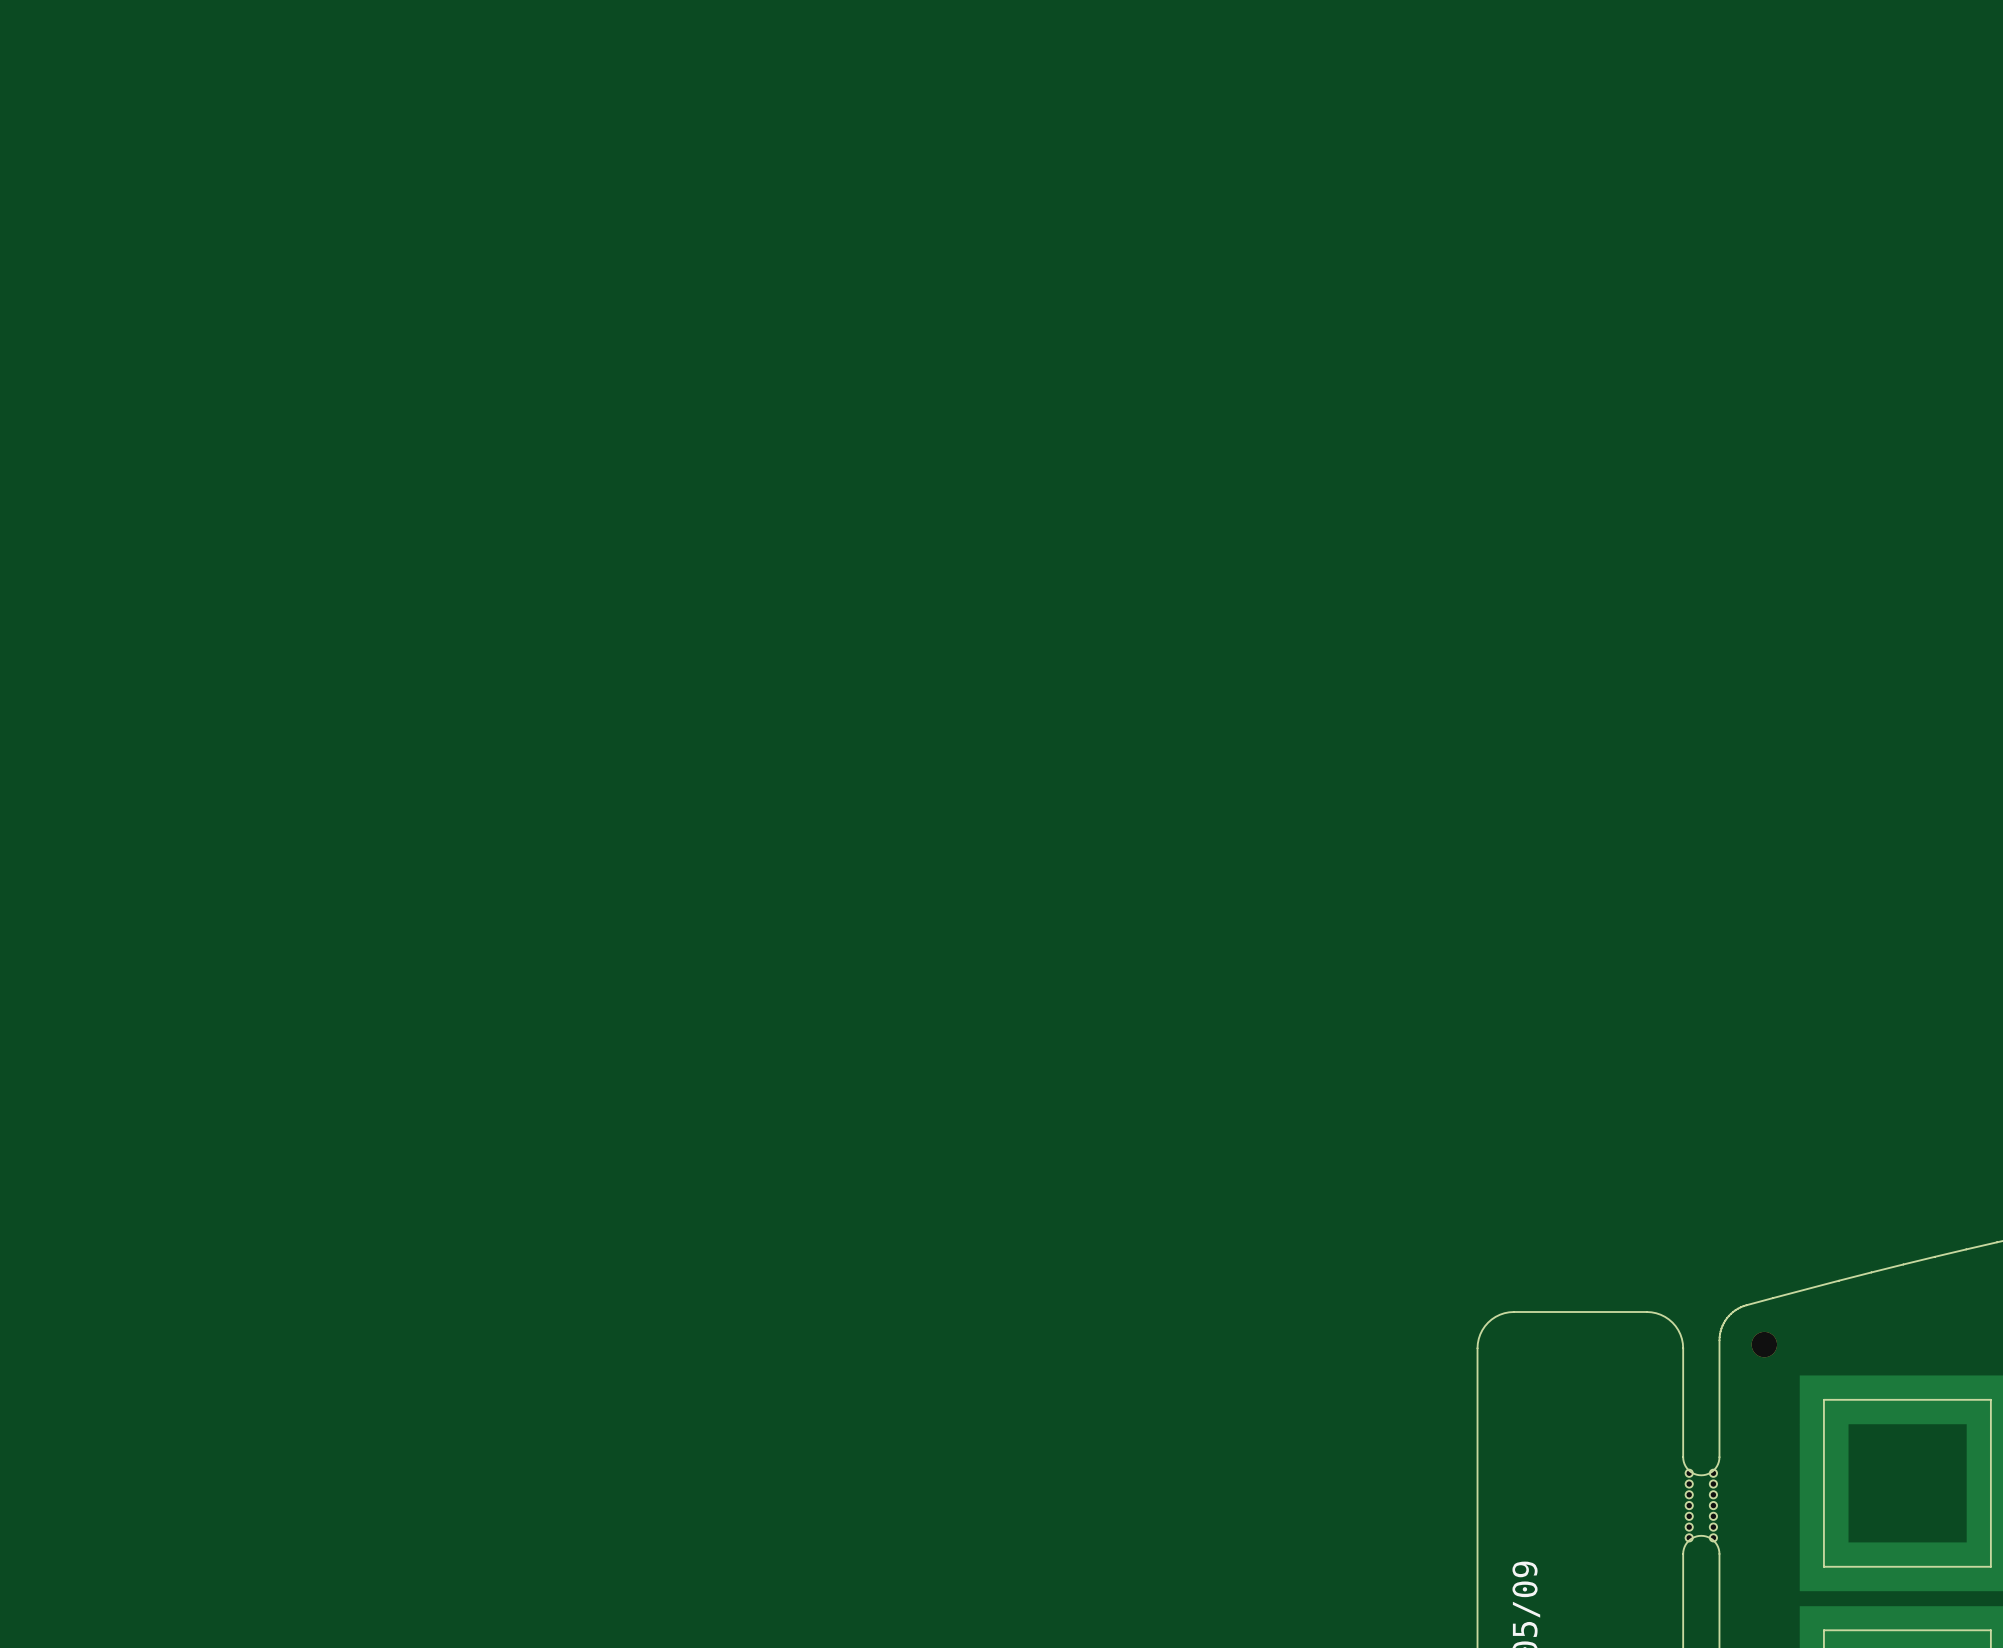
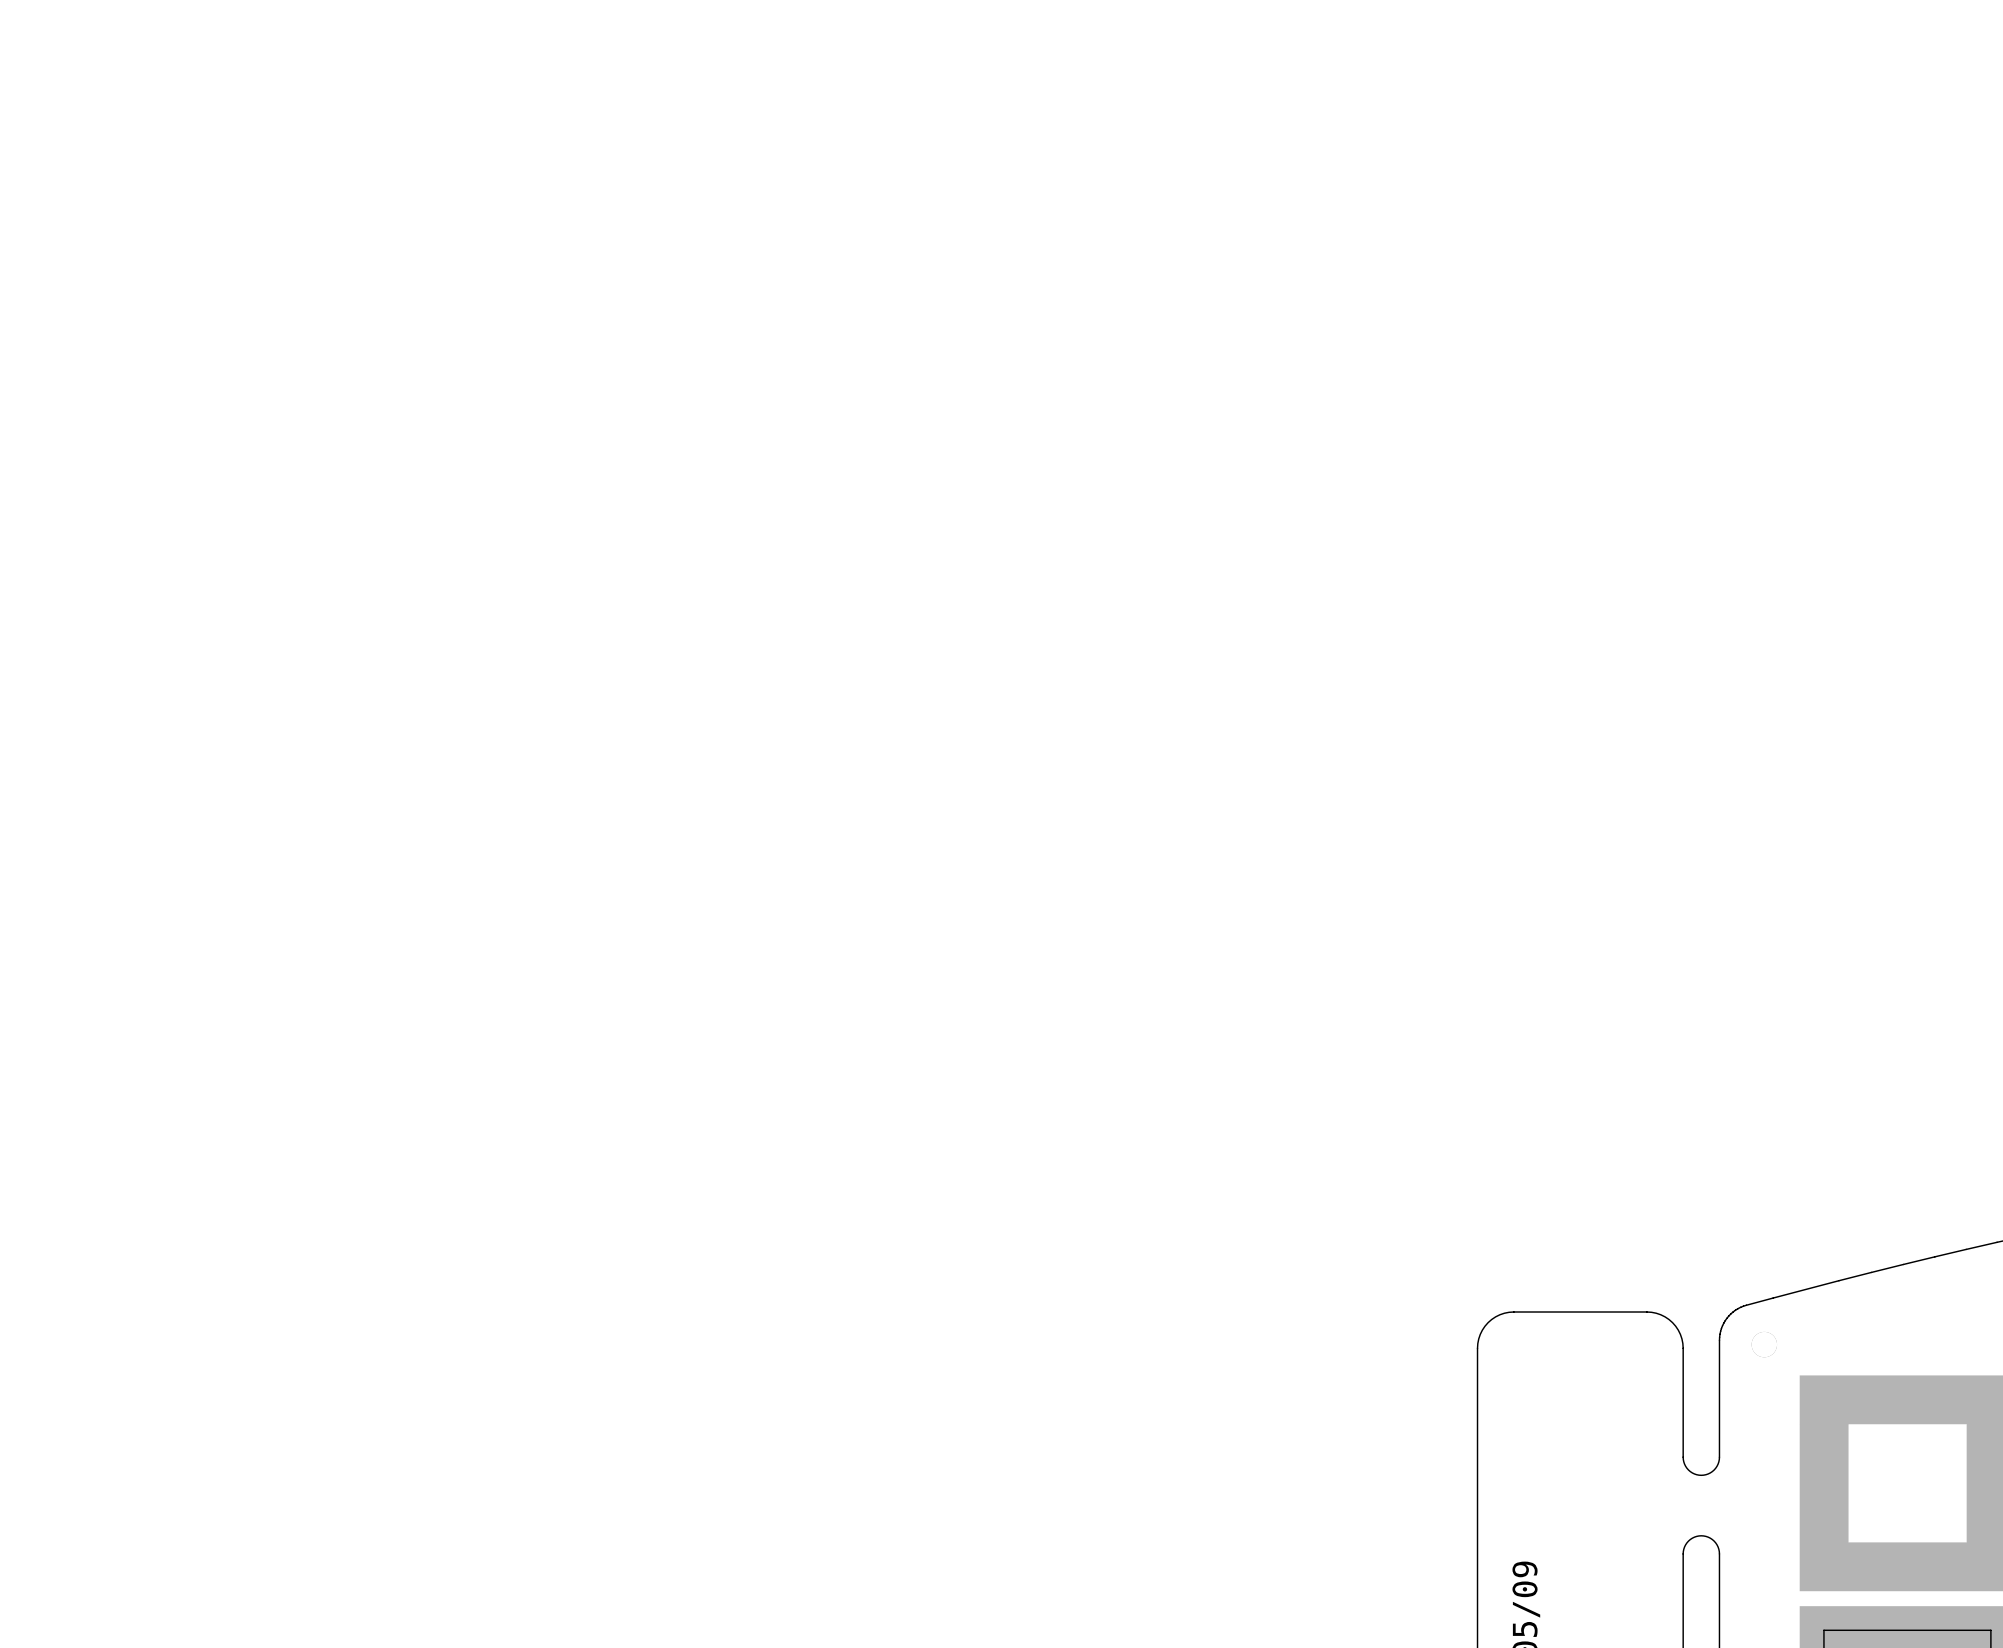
board edge: (1823, 1399) (1990, 1399) (1990, 1566) (1823, 1566) (1823, 1399) -> none
part: (1701, 1505) -> none

